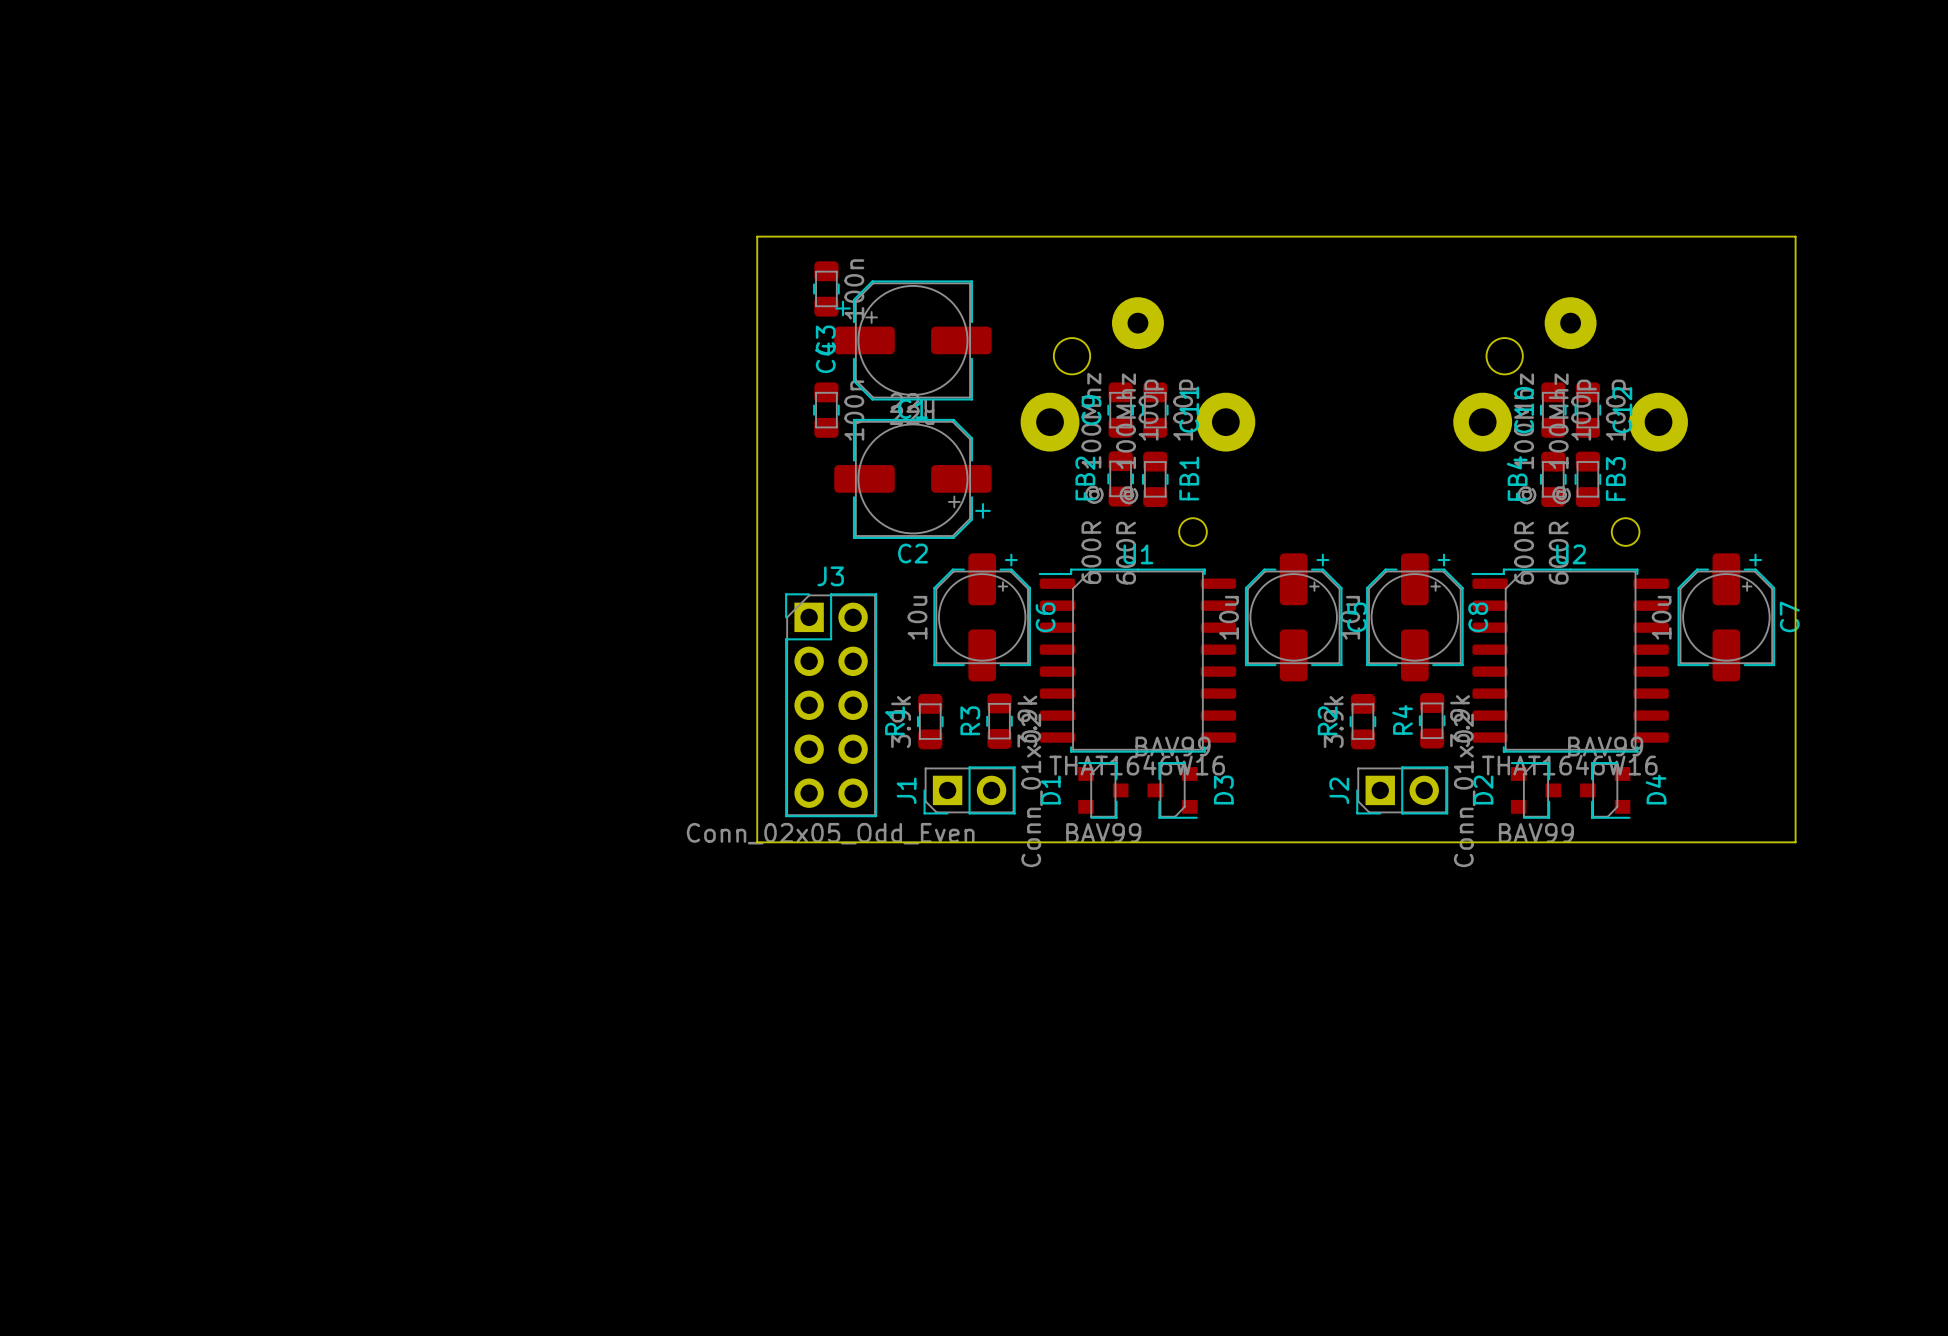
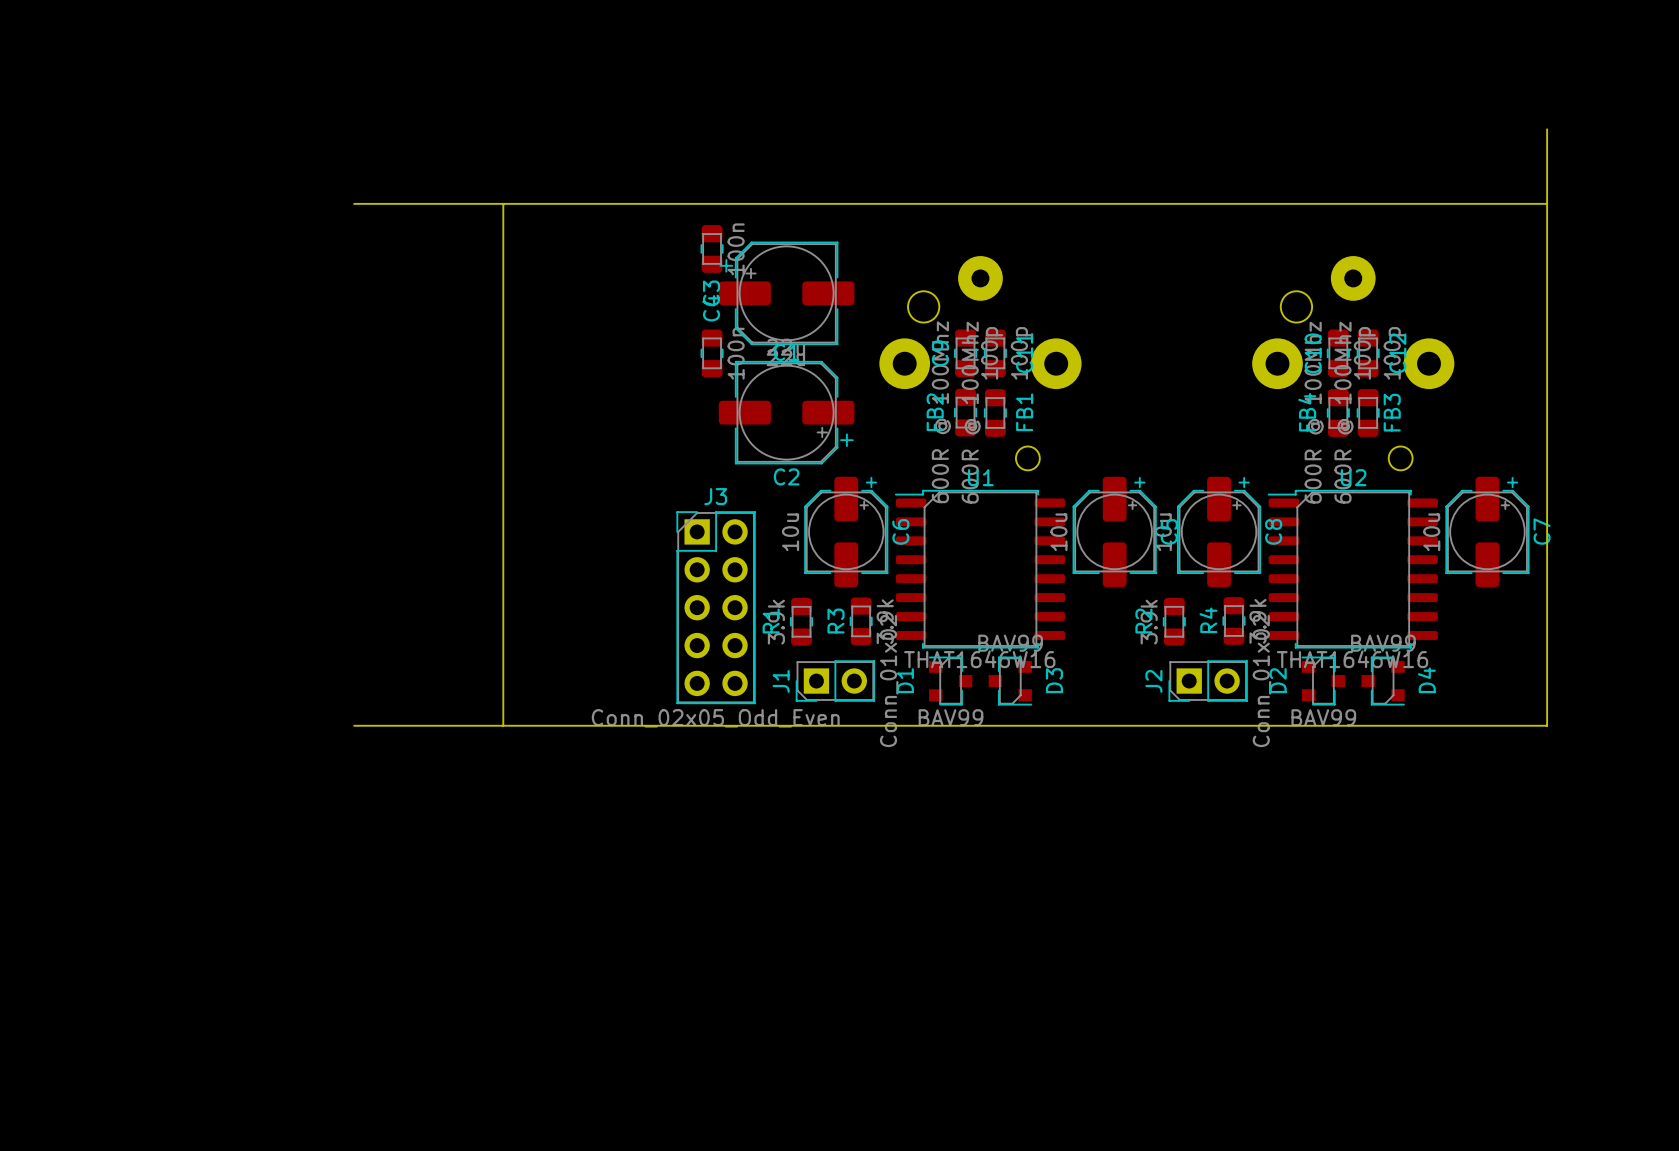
board edge: none -> (1547, 129) (1547, 203)
board edge: none -> (503, 203) (503, 725)
board edge: (757, 236) (757, 842) -> (652, 203) (354, 203)
board edge: none -> (354, 725) (652, 725)

